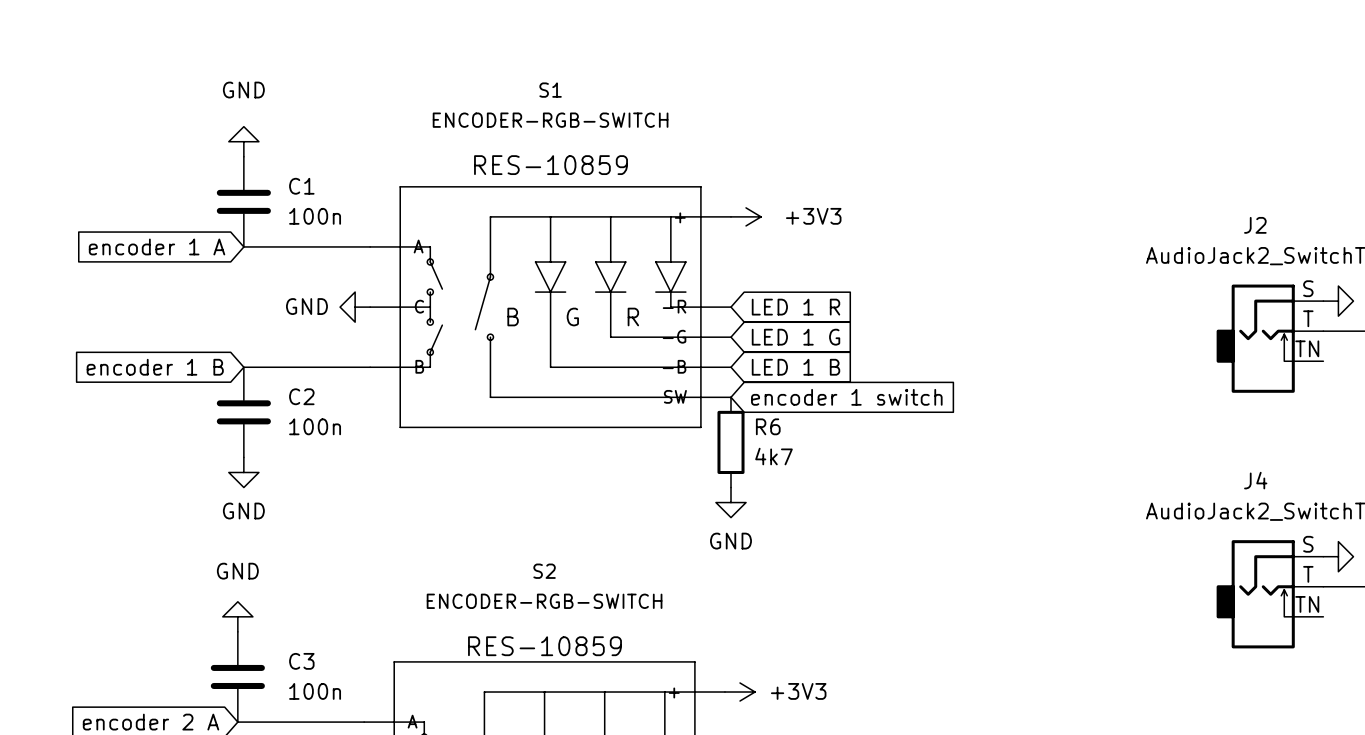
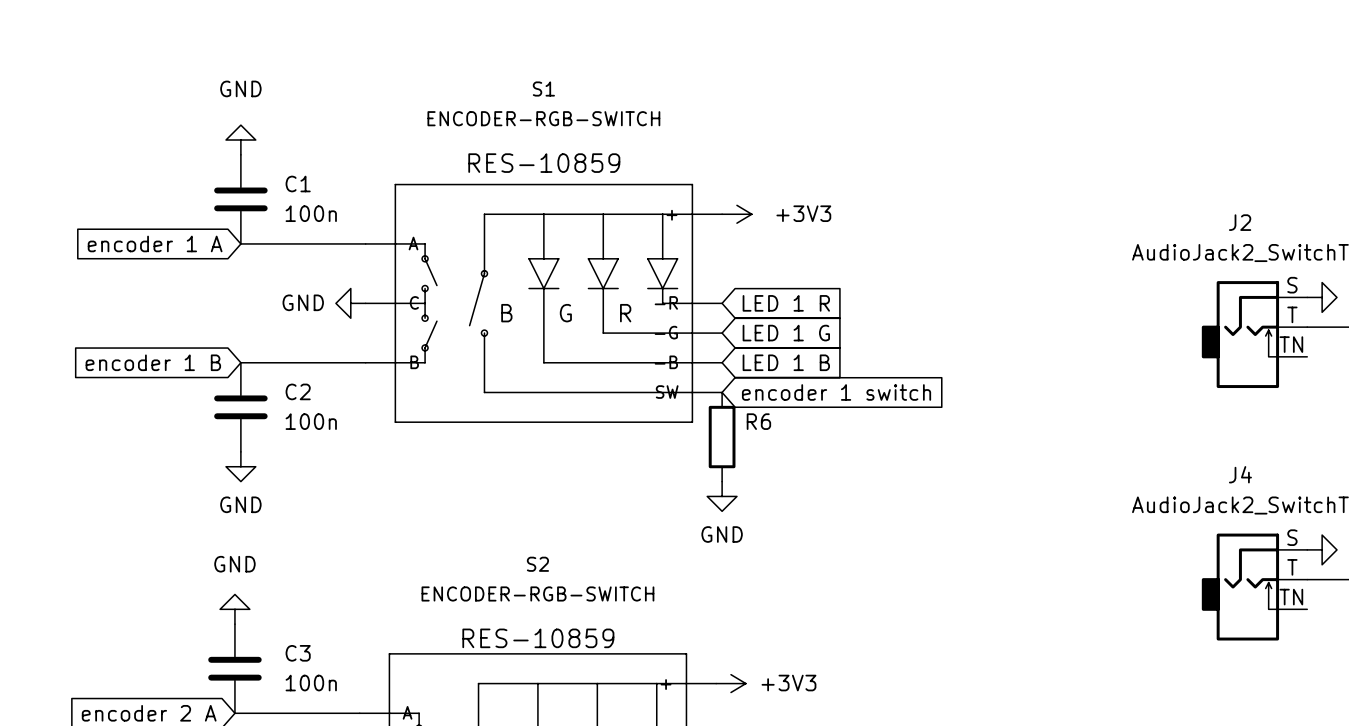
R6 value: 4k7 (773, 456) -> none

